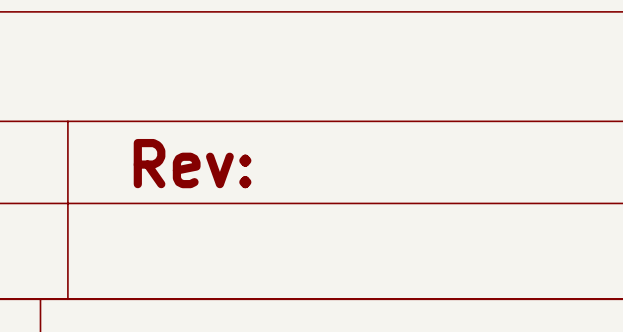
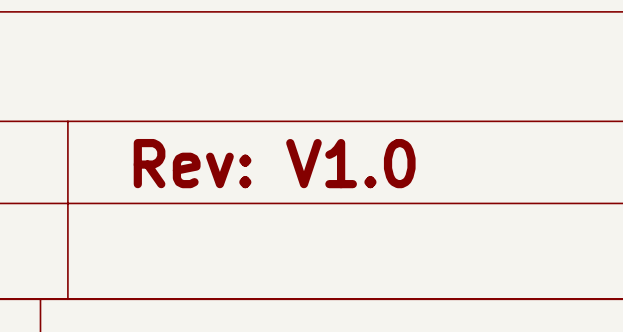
title block: Rev: (192, 163) -> Rev: V1.0 (274, 163)

